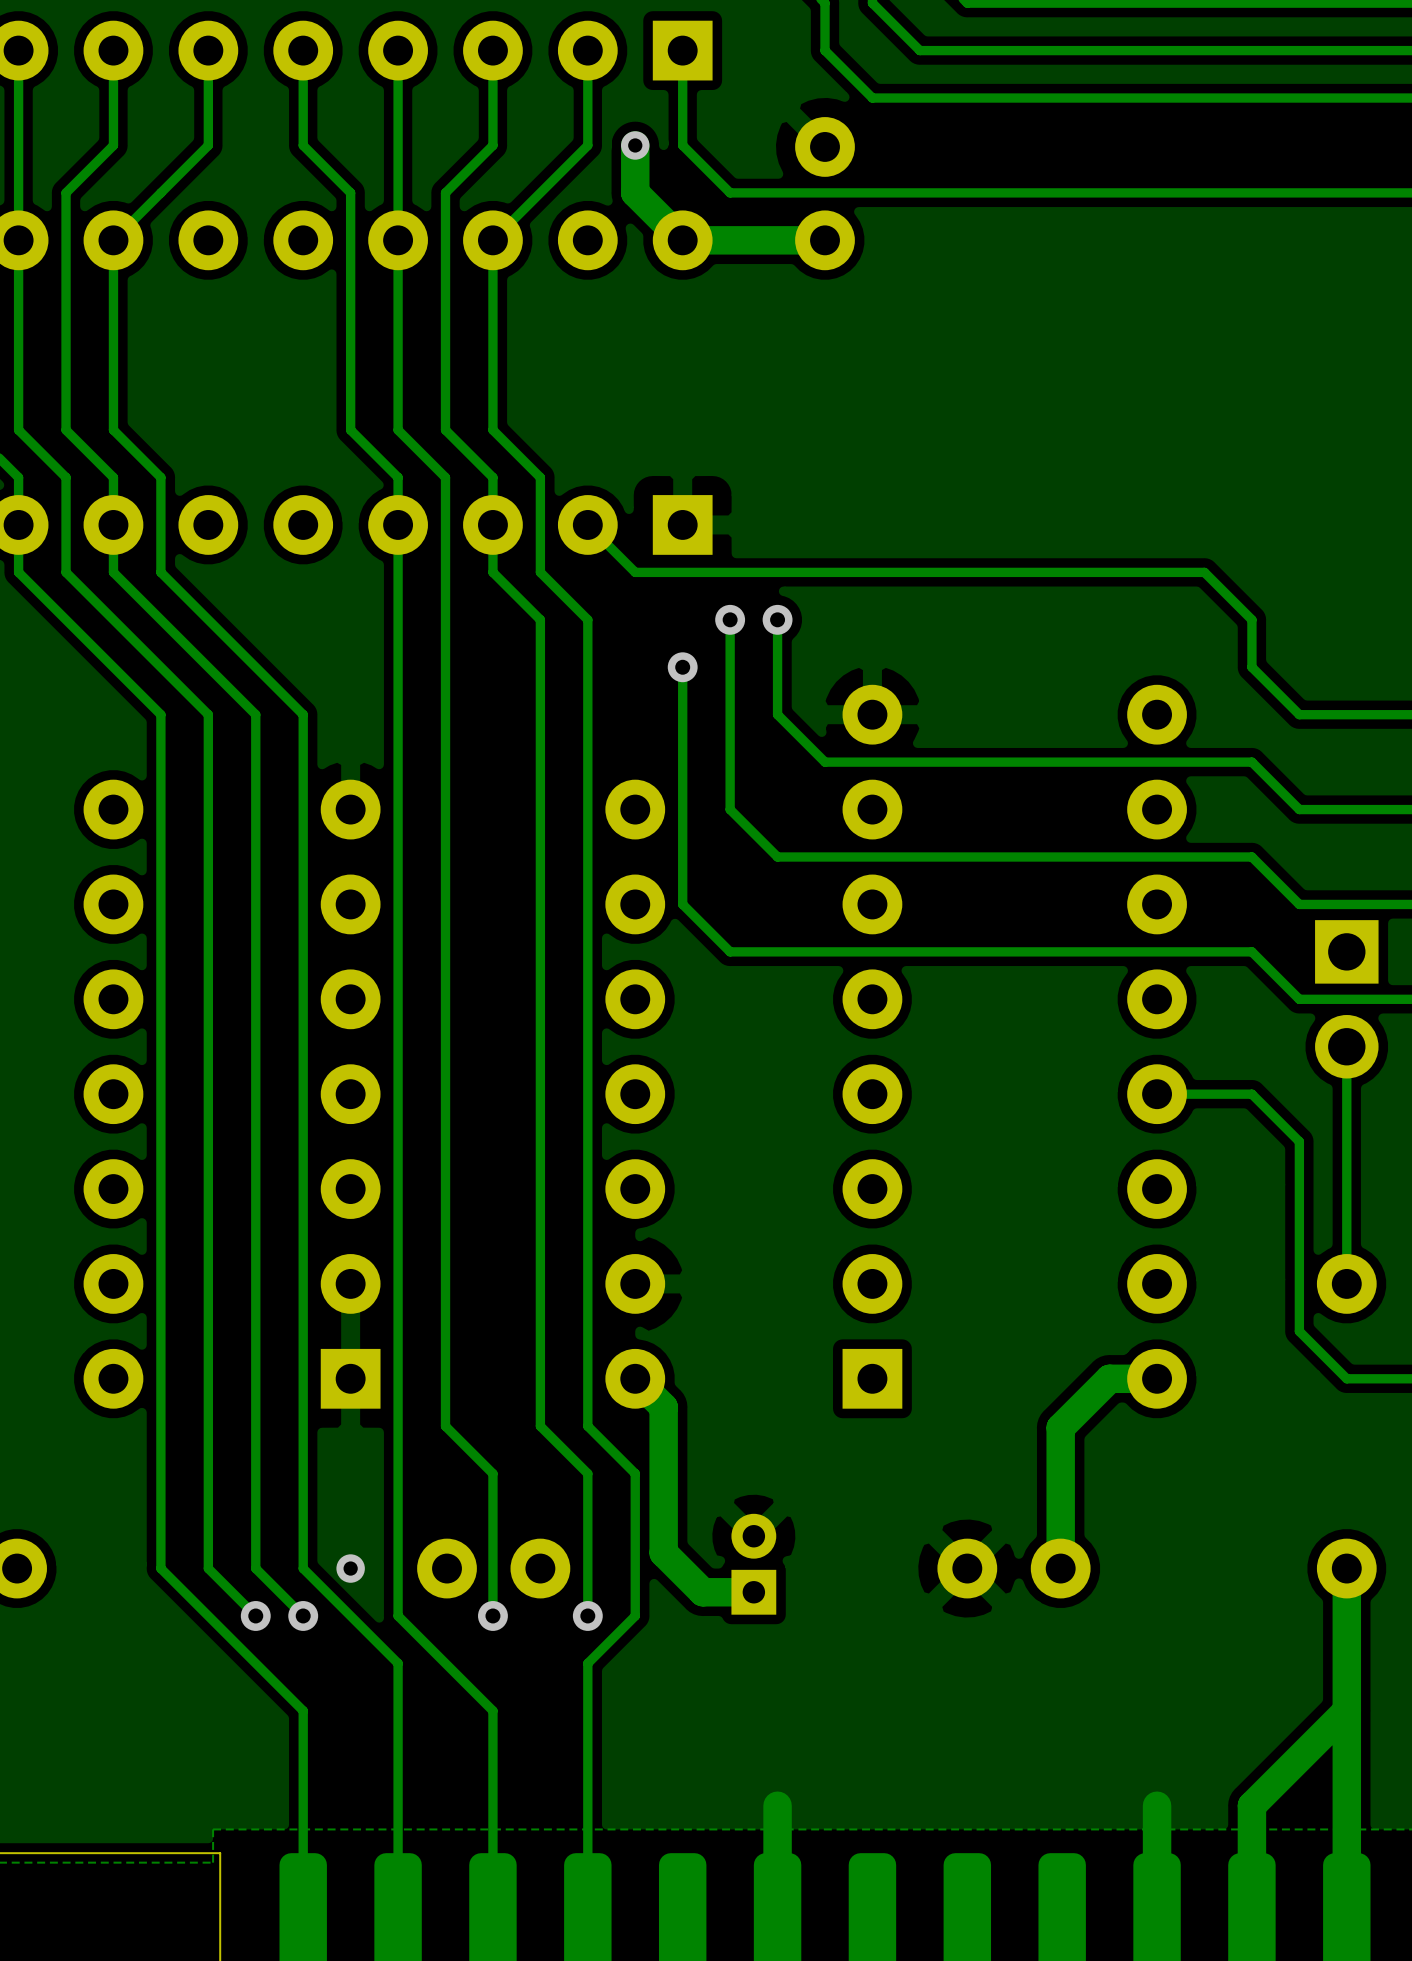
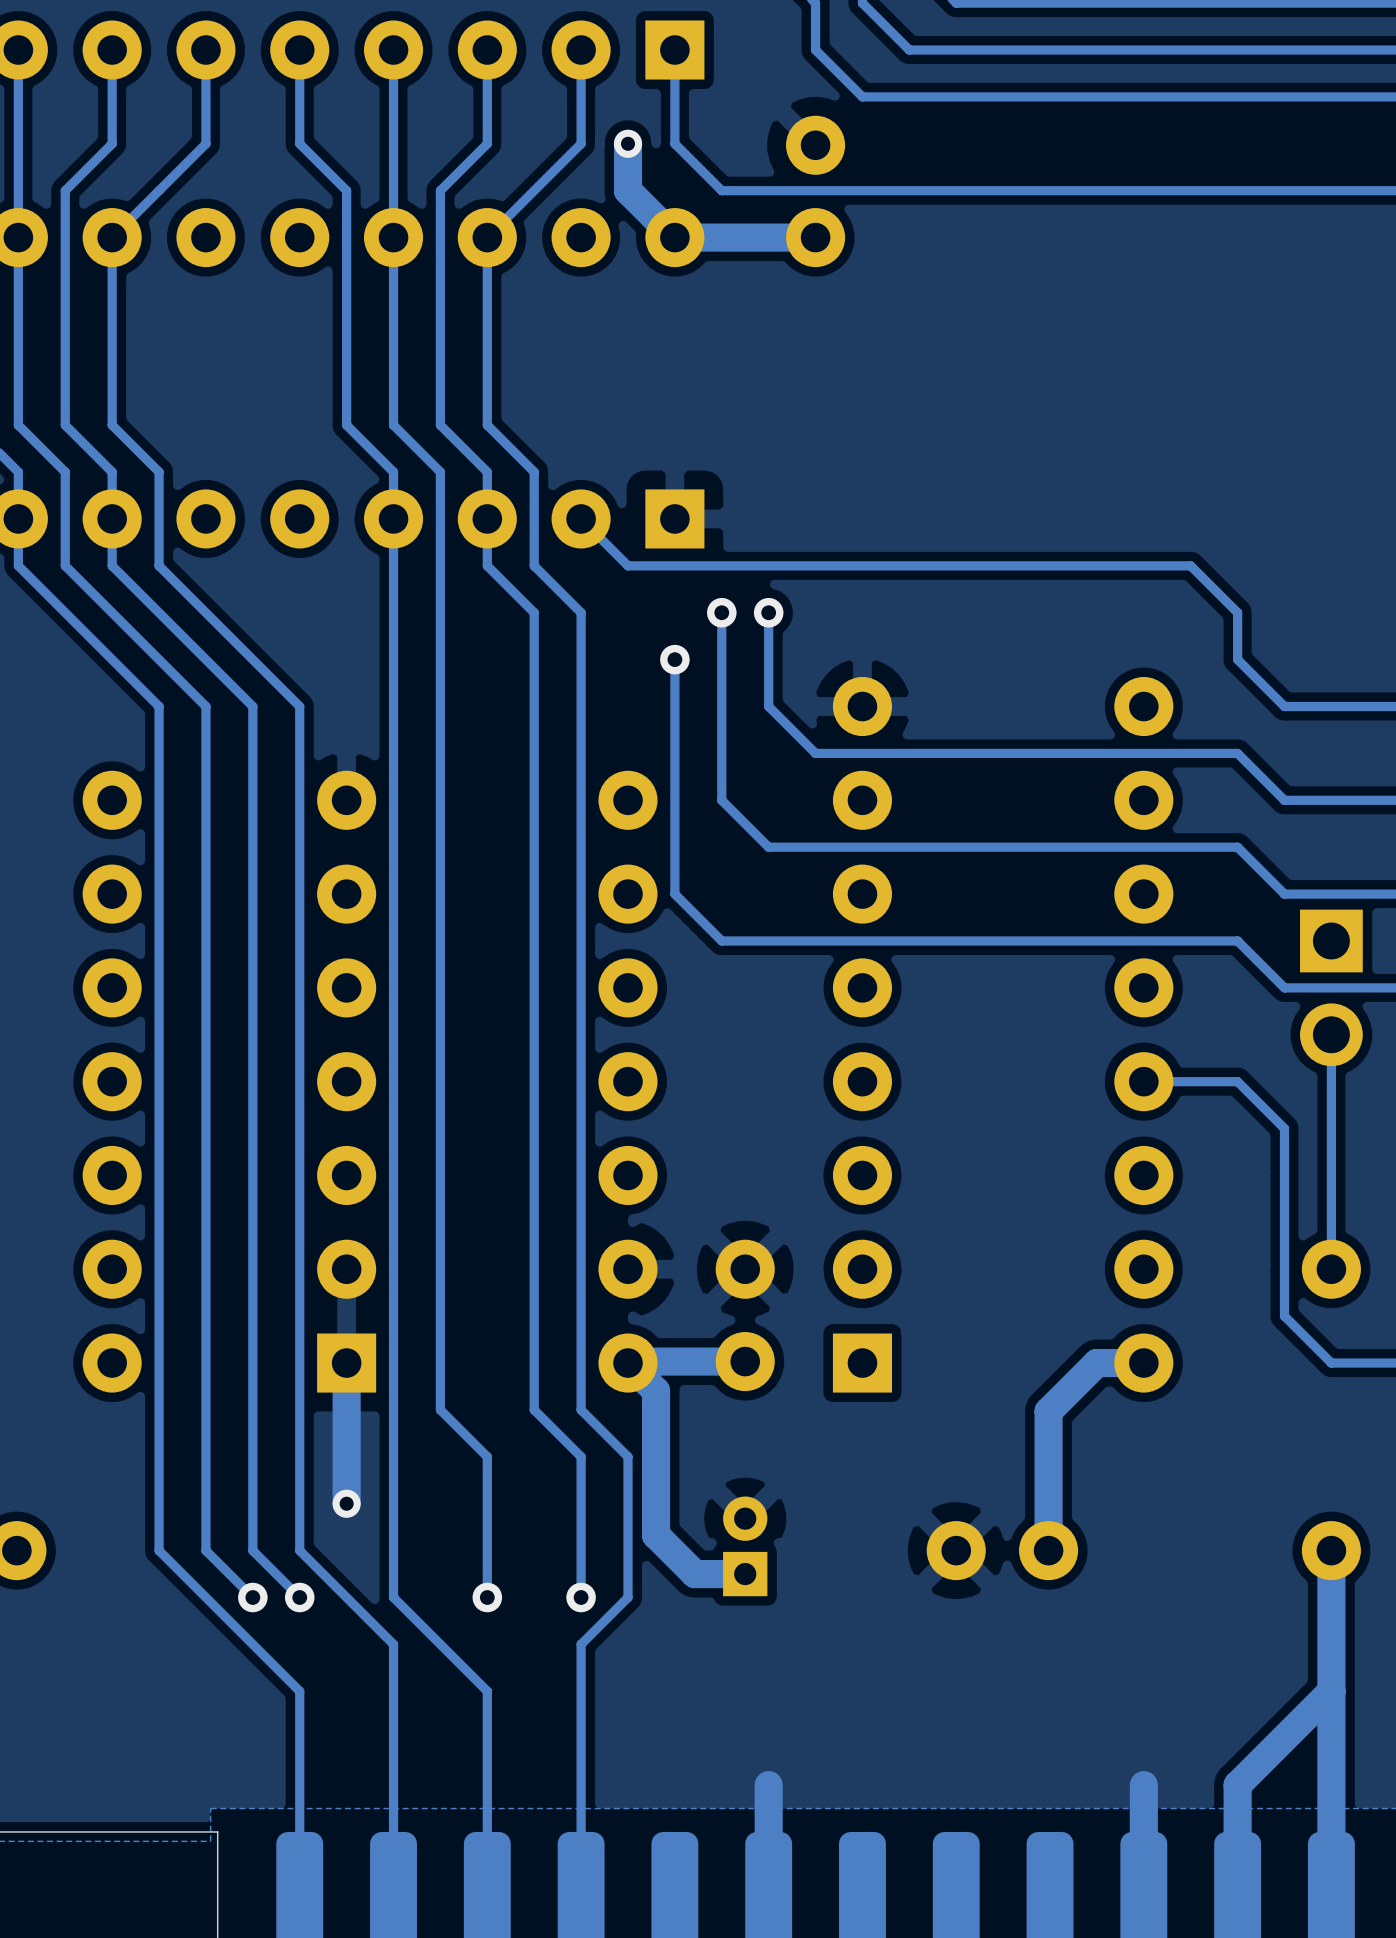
track: none -> (745, 1361) (629, 1361)
track: none -> (346, 1363) (346, 1503)
via position: (350, 1568) -> (346, 1503)
part rotation: 0° (493, 1568) -> 90° clockwise (745, 1315)
part position: (493, 1568) -> (745, 1315)

